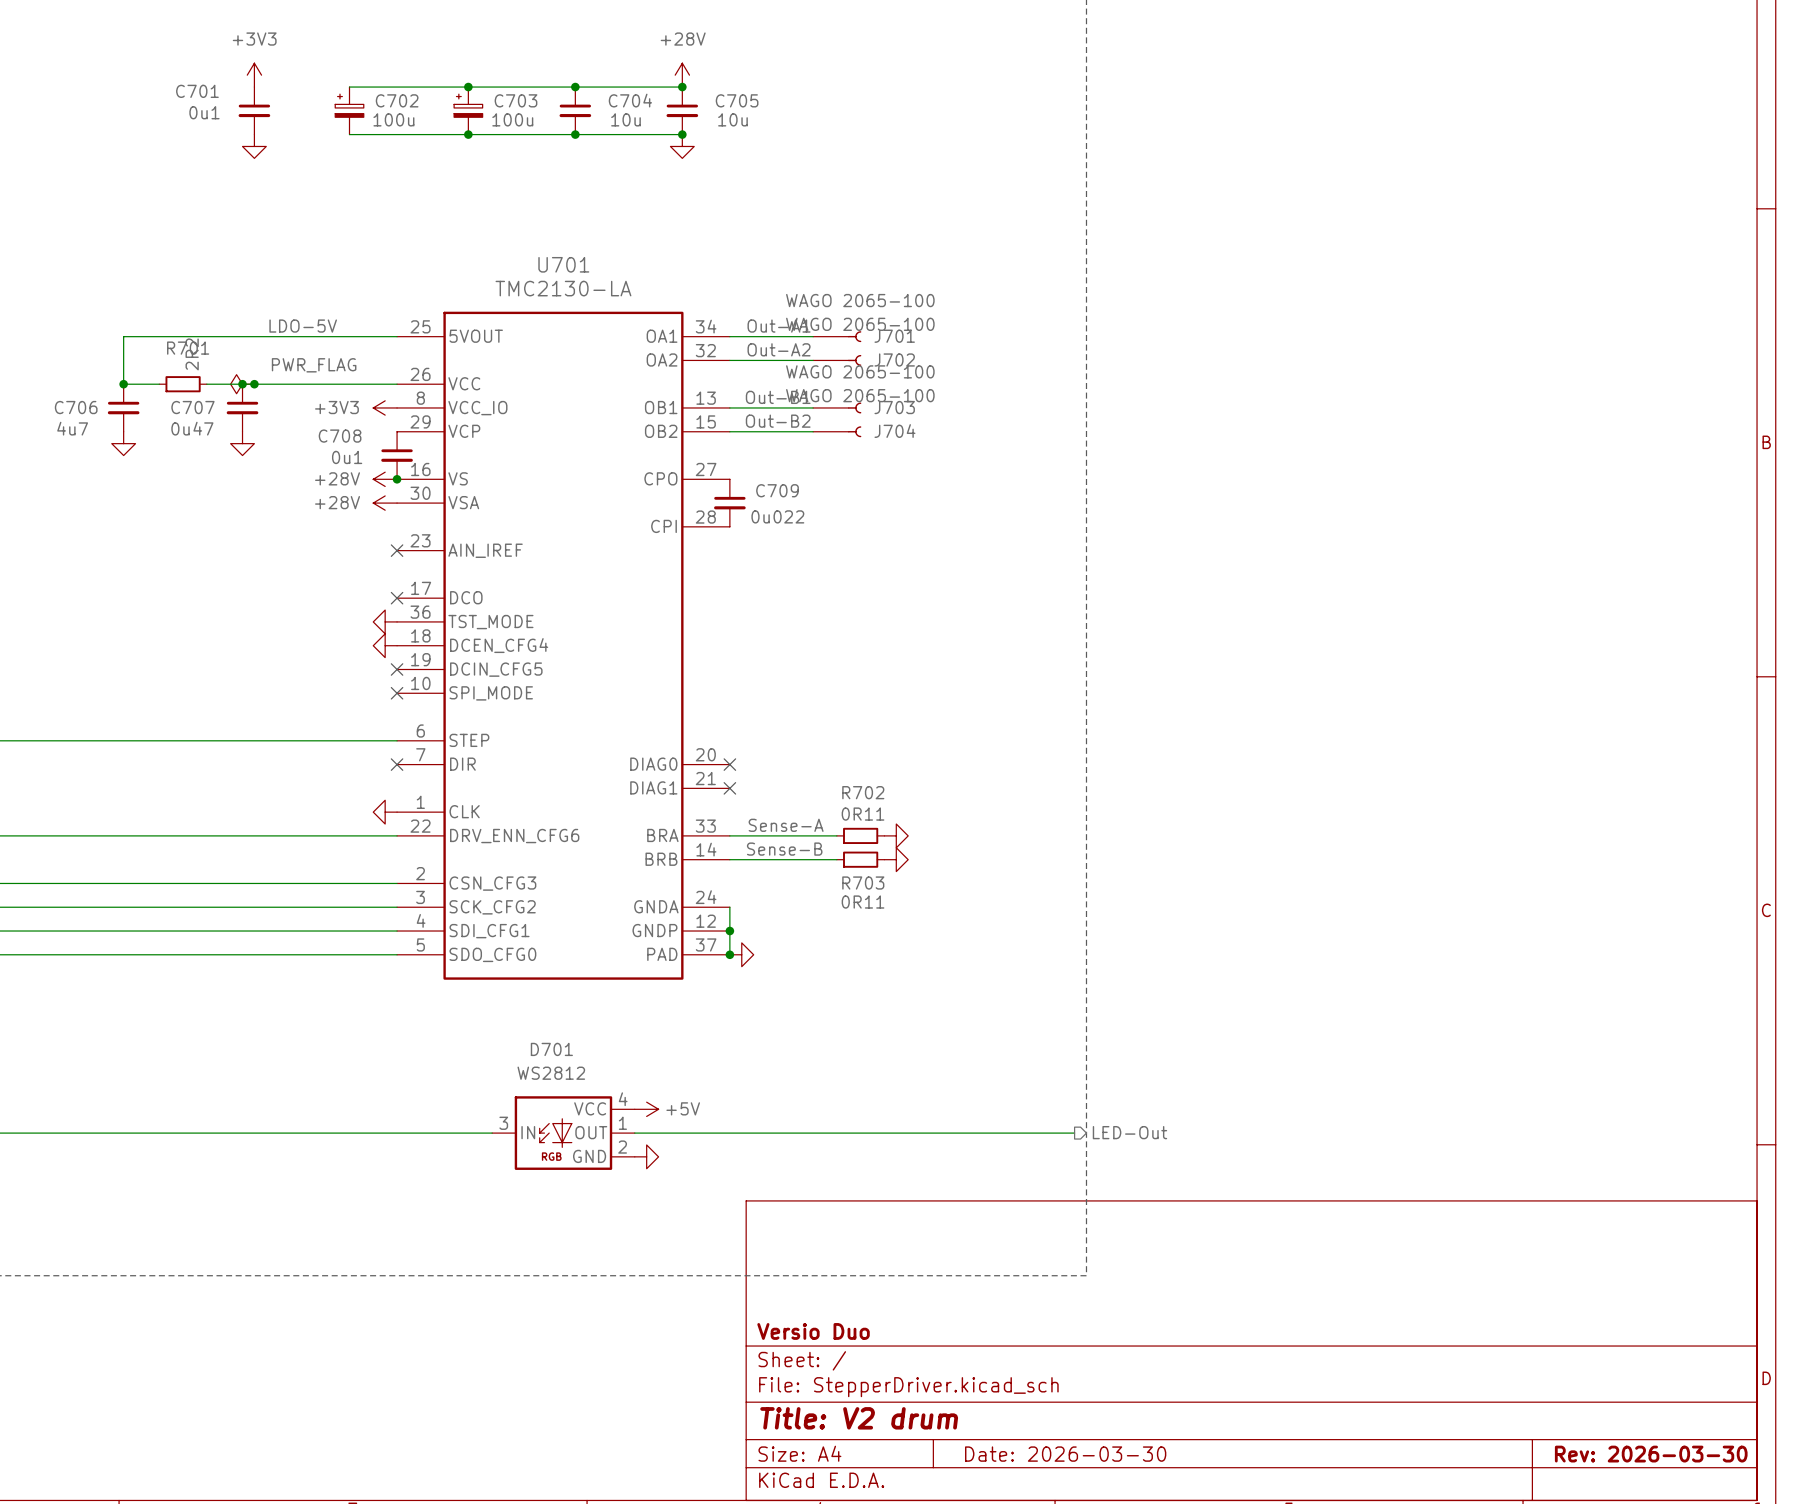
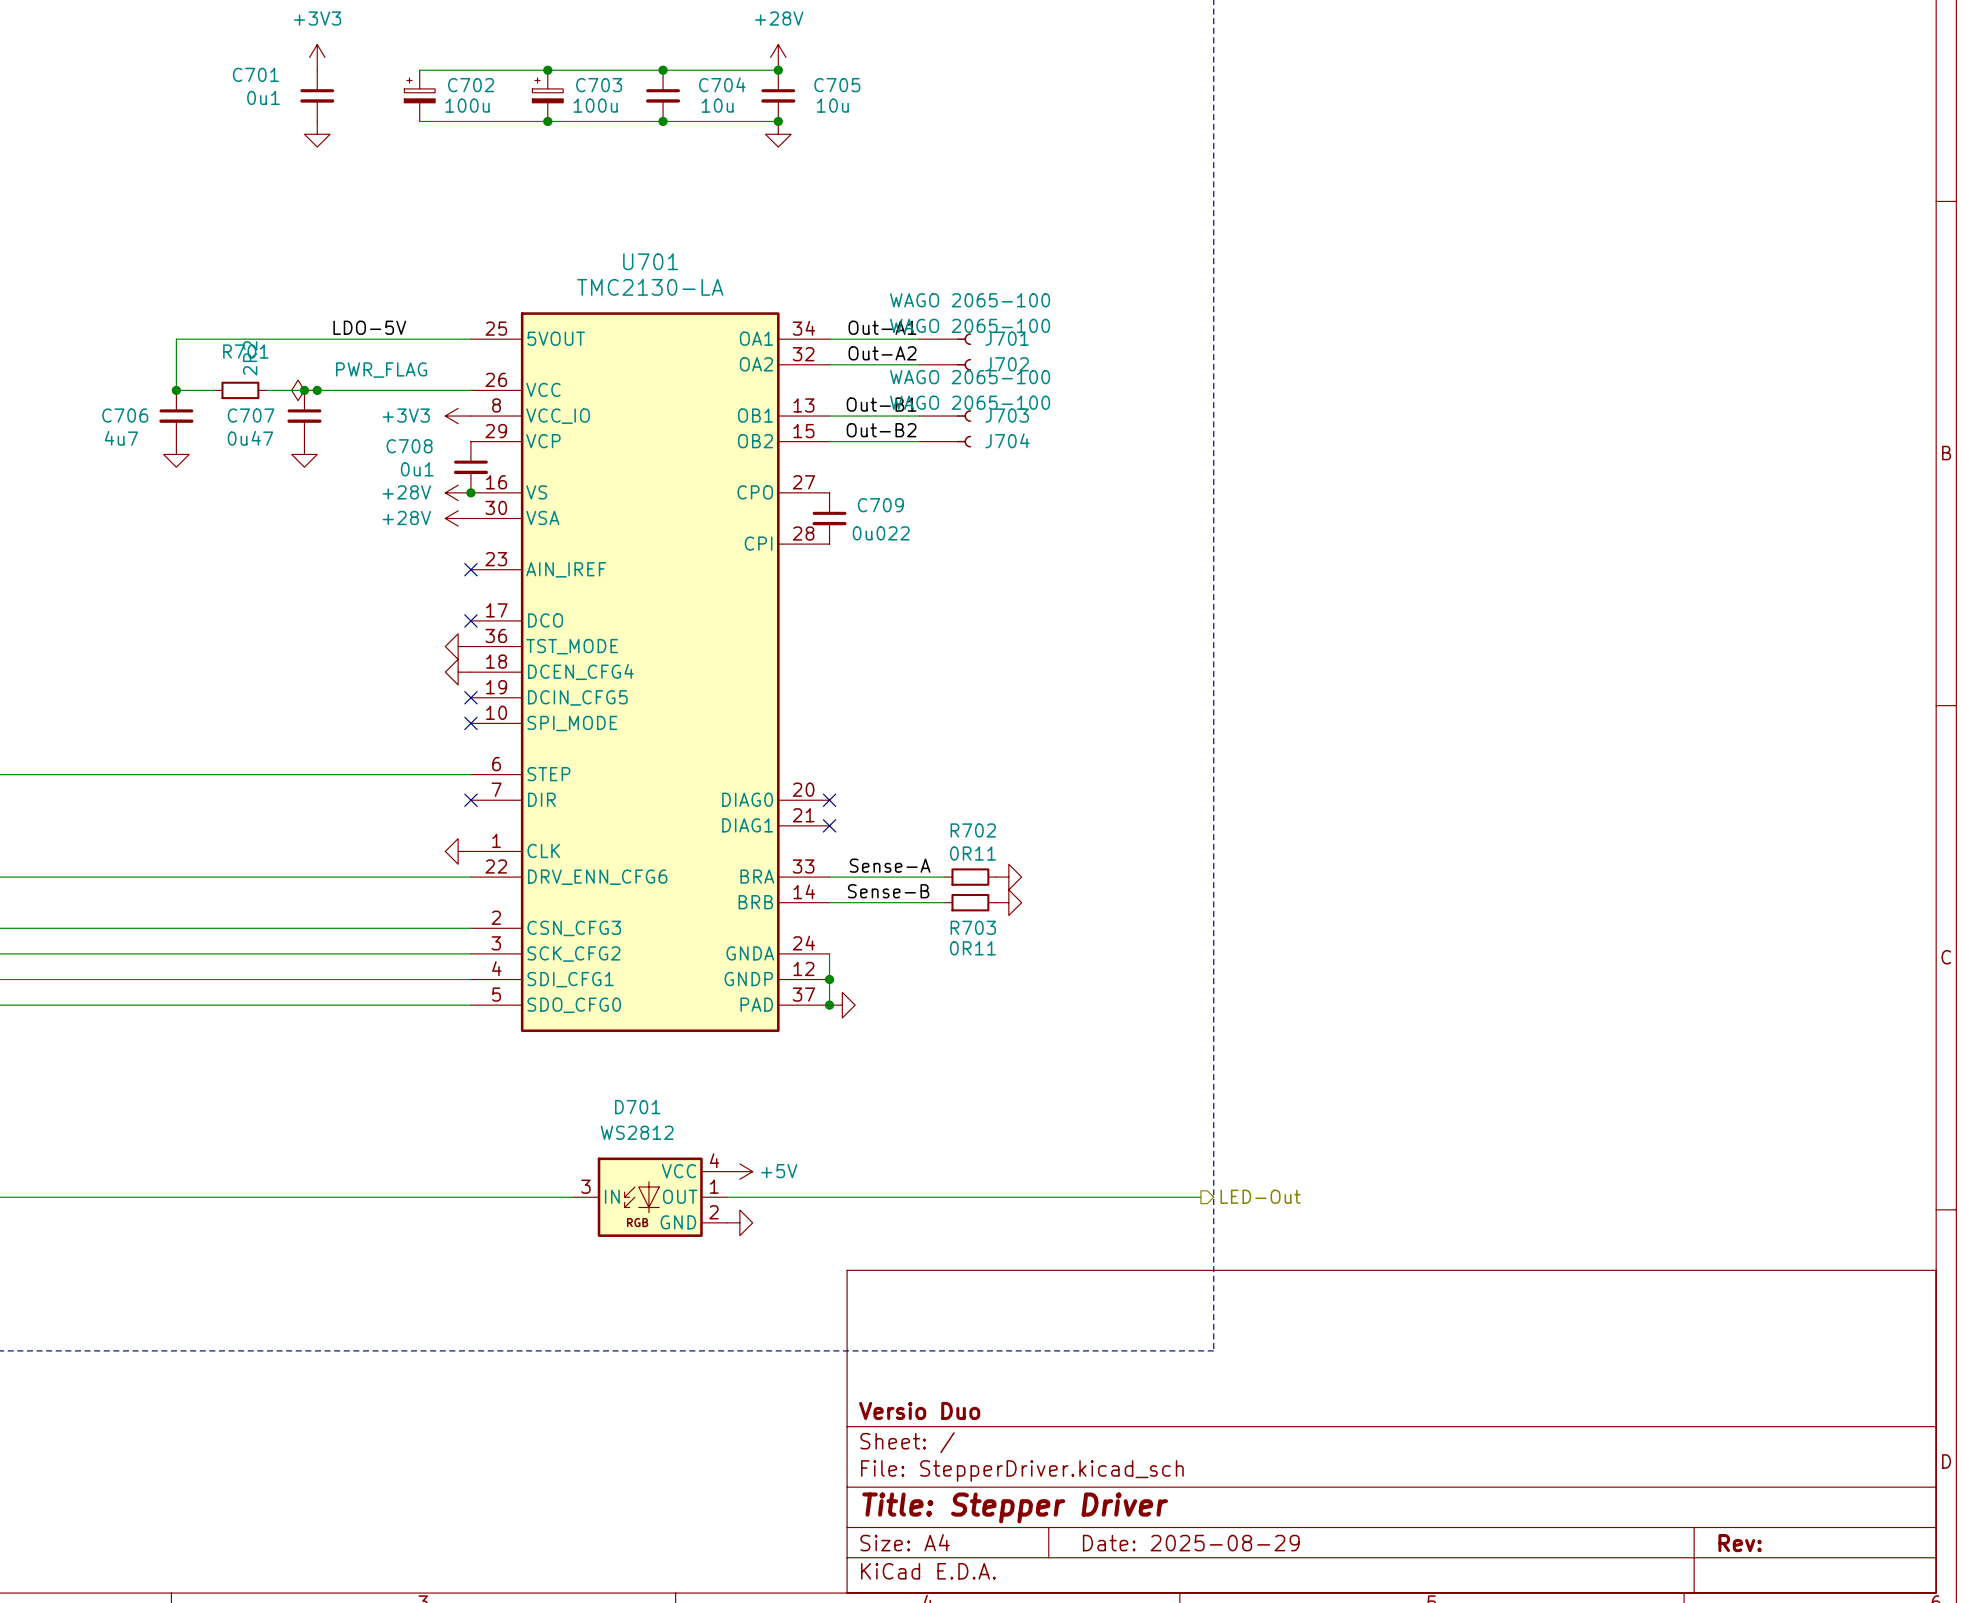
title block: Title: V2 drum (859, 1418) -> Title: Stepper Driver (1015, 1507)
title block: Date: 2026-03-30 (1065, 1454) -> Date: 2025-08-29 (1191, 1543)
title block: Rev: 2026-03-30 (1651, 1454) -> Rev: (1740, 1543)

